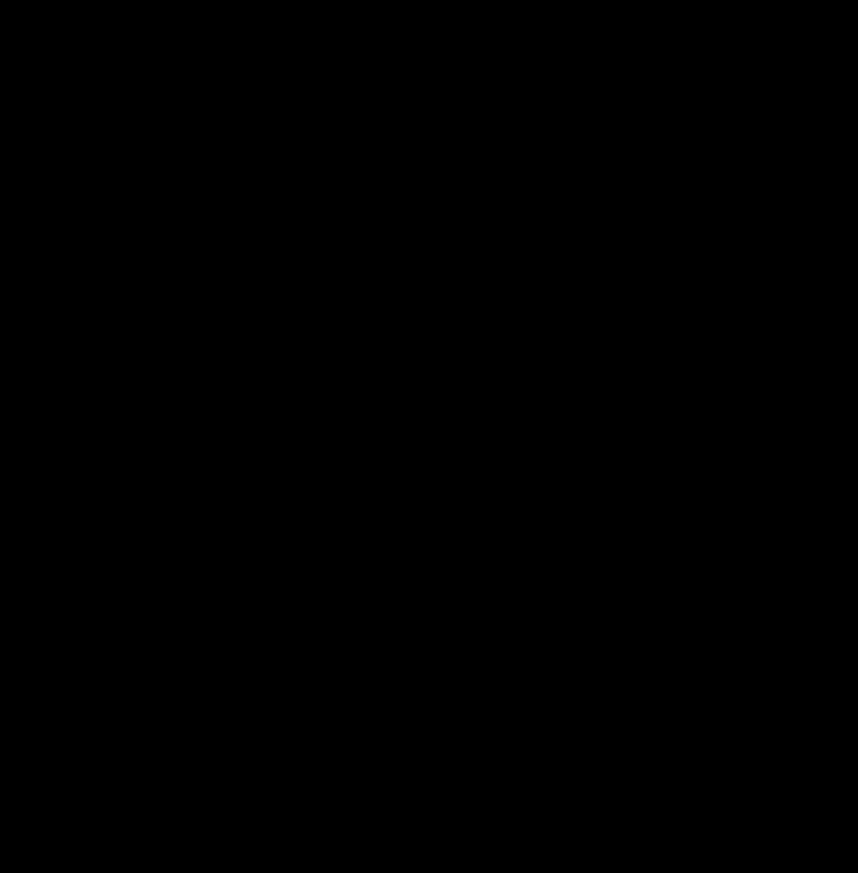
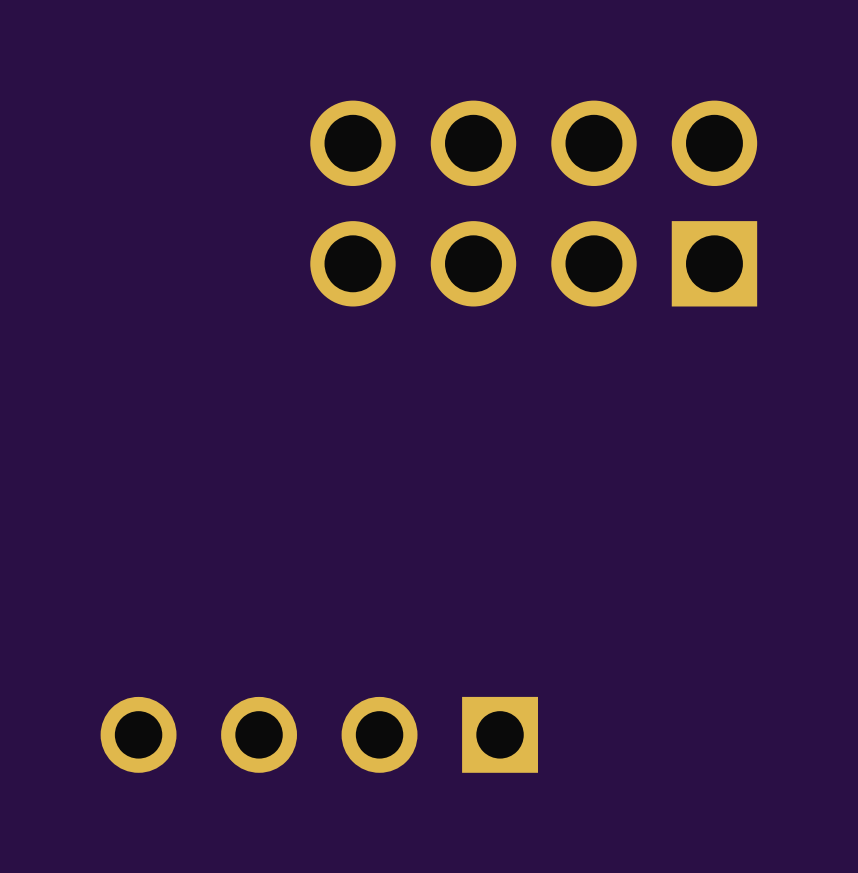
part: none -> (533, 203)
part: none -> (319, 734)

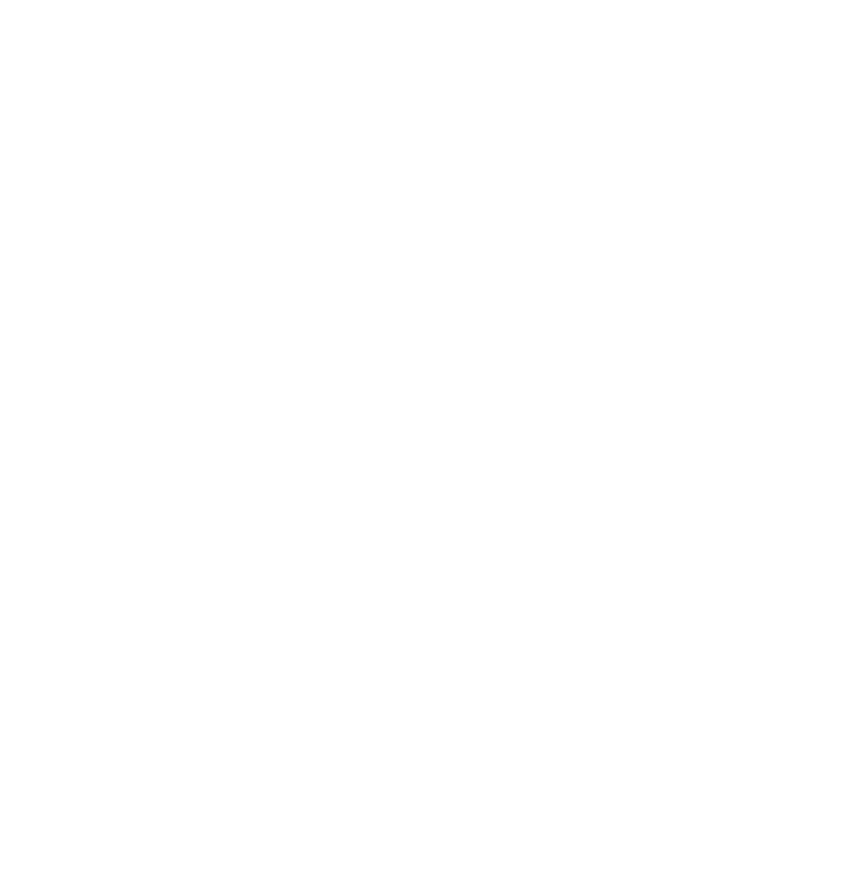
part: (533, 203) -> none
part: (319, 734) -> none

